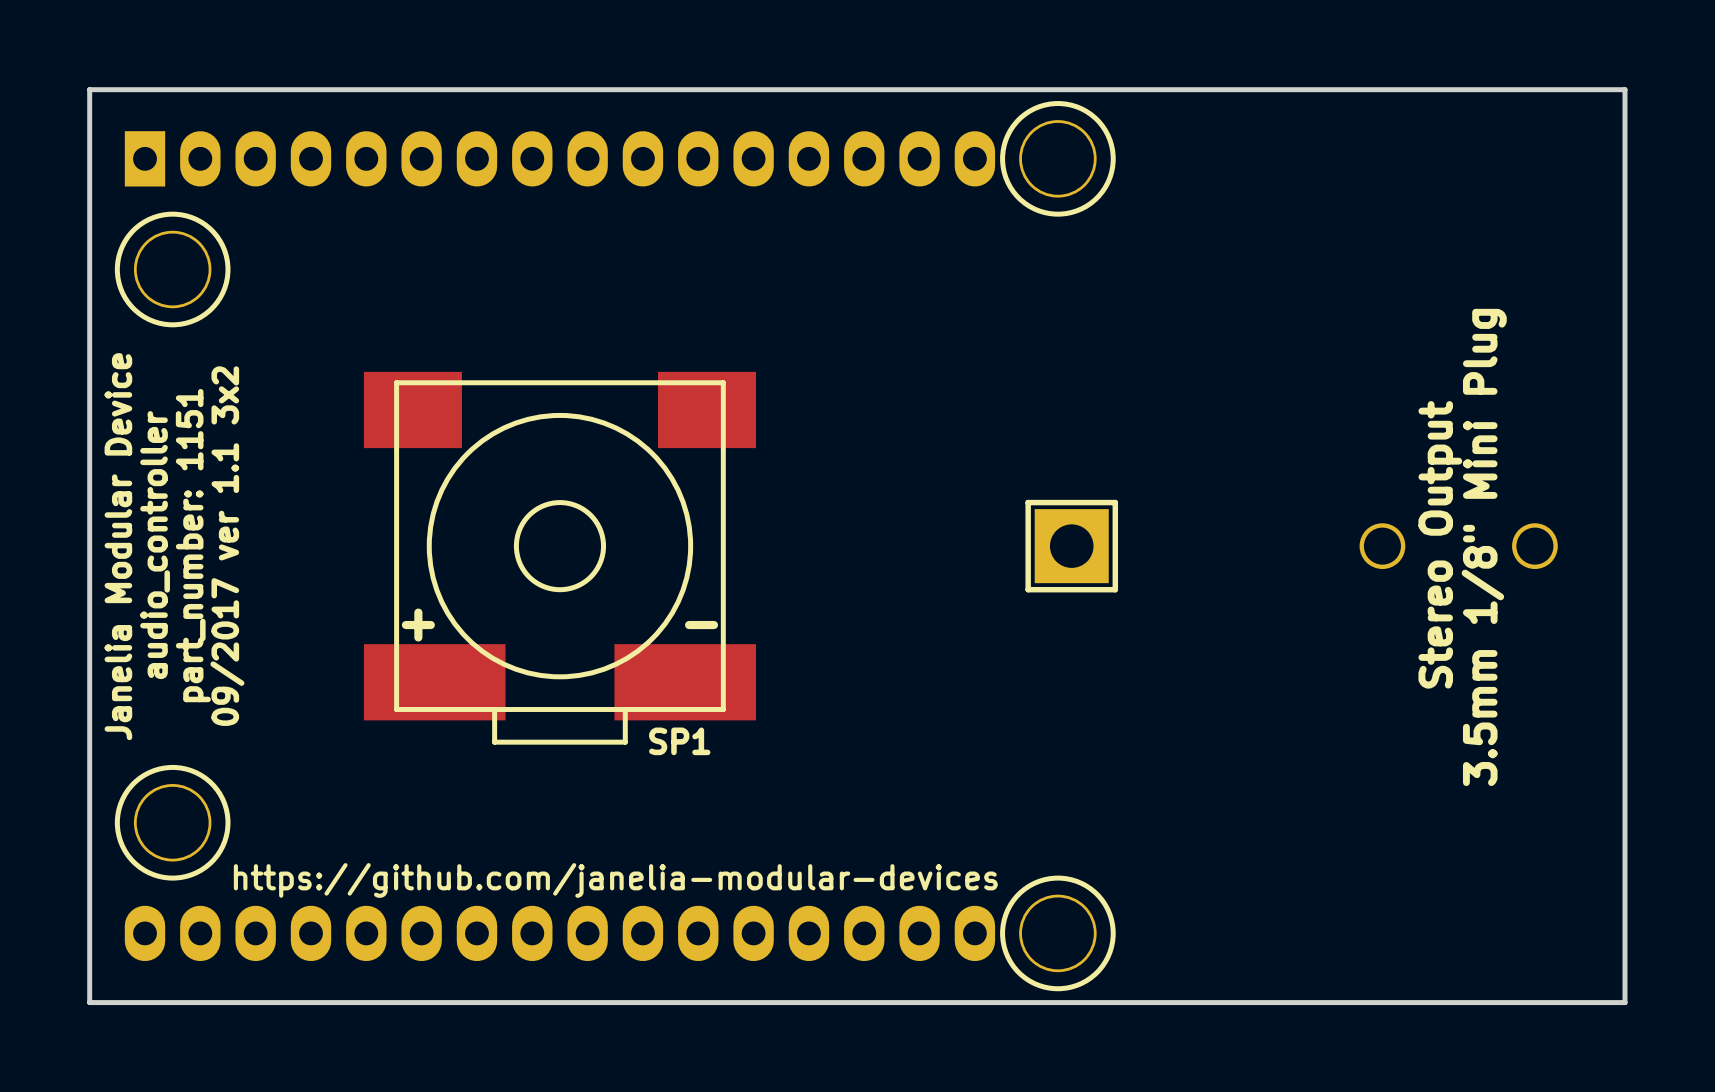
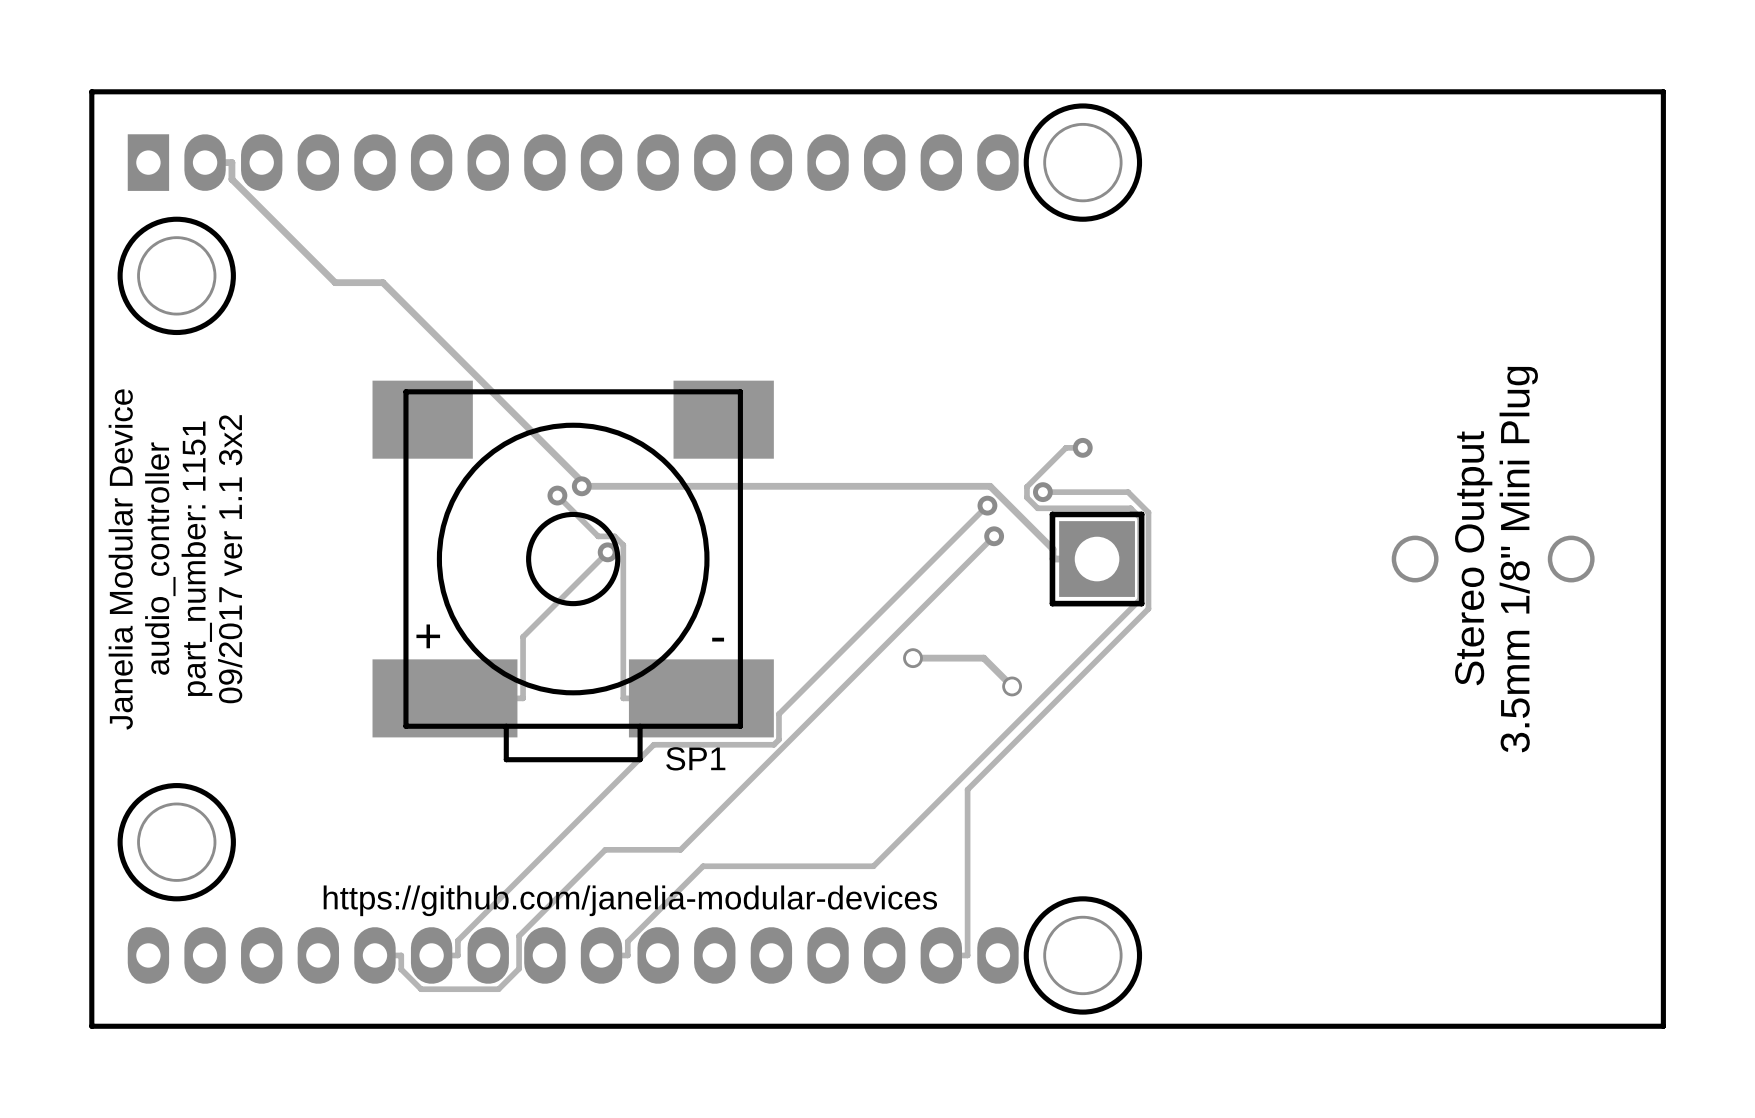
track: none -> (205, 162) (231, 162) (231, 179) (335, 282) (382, 282) (581, 481) (581, 486) (990, 486) (1052, 549) (1052, 559) (1097, 559)
track: none -> (1082, 447) (1065, 447) (1026, 486) (1026, 497) (1037, 508) (1130, 508) (1140, 517) (1140, 599) (873, 866) (703, 866) (627, 941) (627, 955) (601, 955)
via: none -> (1082, 447)
via: none -> (581, 486)
track: none -> (1042, 492) (1128, 492) (1148, 512) (1148, 608) (967, 789) (967, 955) (941, 955)
via: none -> (1042, 492)
track: none -> (557, 495) (598, 536) (614, 536) (623, 545) (623, 698) (701, 698)
via: none -> (557, 495)
track: none -> (987, 505) (778, 714) (778, 739) (773, 744) (653, 744) (457, 940) (457, 955) (431, 955)
via: none -> (987, 505)
track: none -> (994, 536) (680, 849) (605, 849) (519, 936) (519, 968) (498, 989) (421, 989) (401, 969) (401, 955) (374, 955)
via: none -> (994, 536)
track: none -> (607, 552) (523, 636) (523, 698) (444, 698)
via: none -> (607, 552)
track: none -> (912, 658) (983, 658) (1012, 686)
via: none -> (912, 658)
via: none -> (1012, 686)

